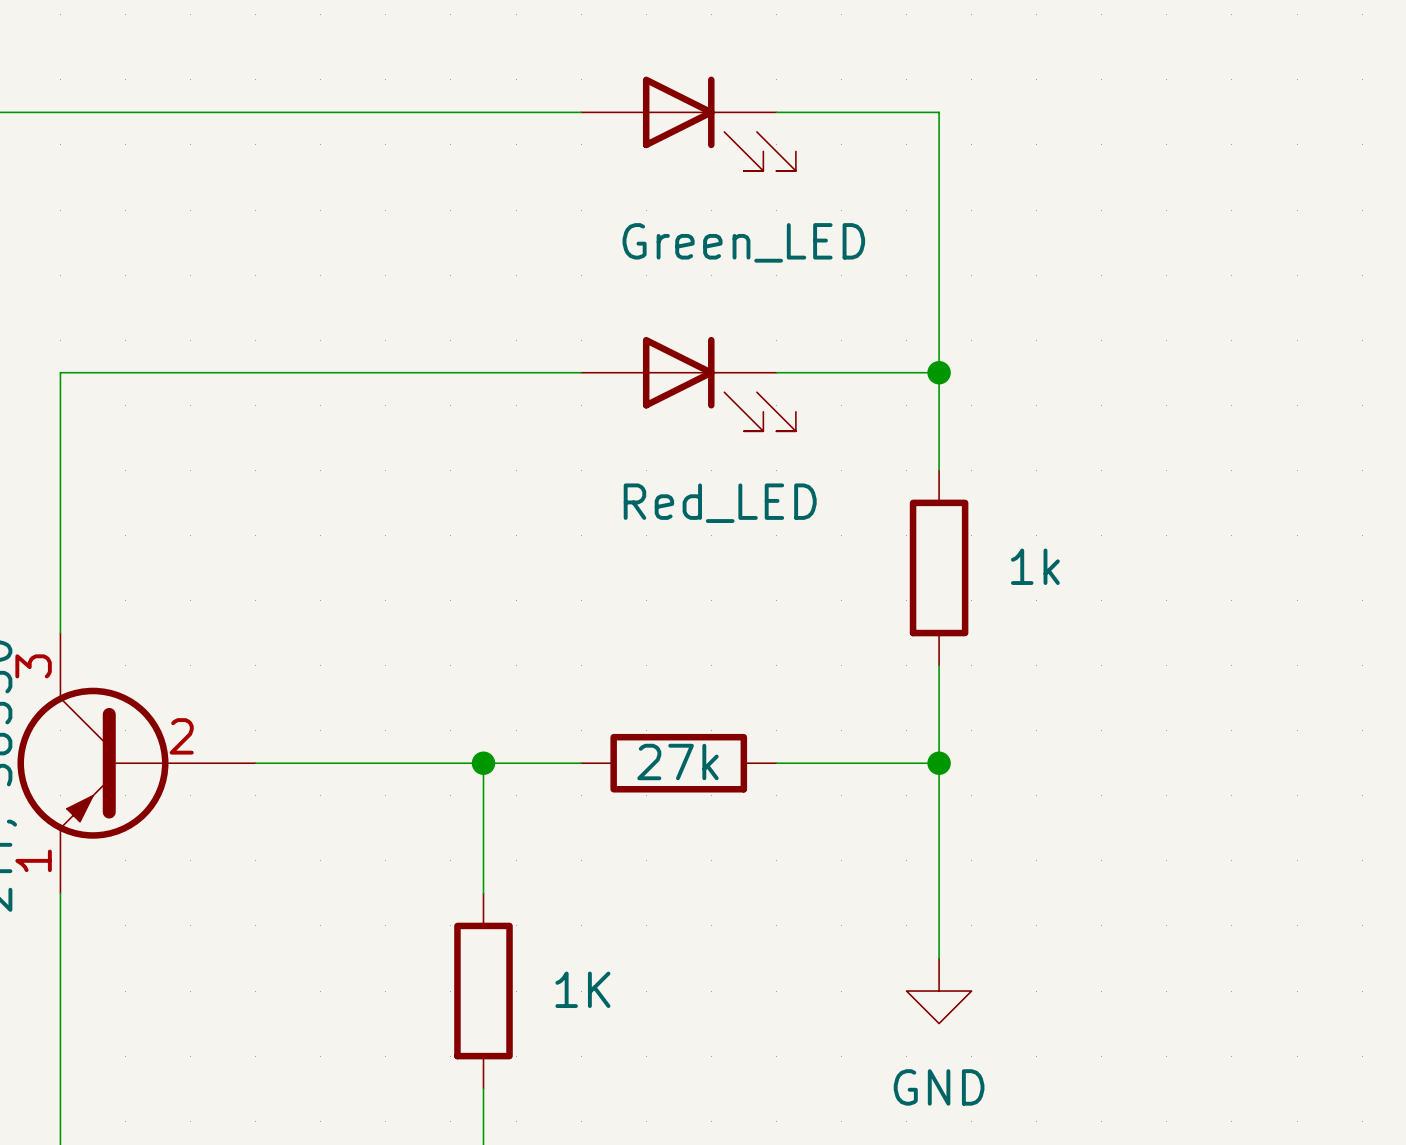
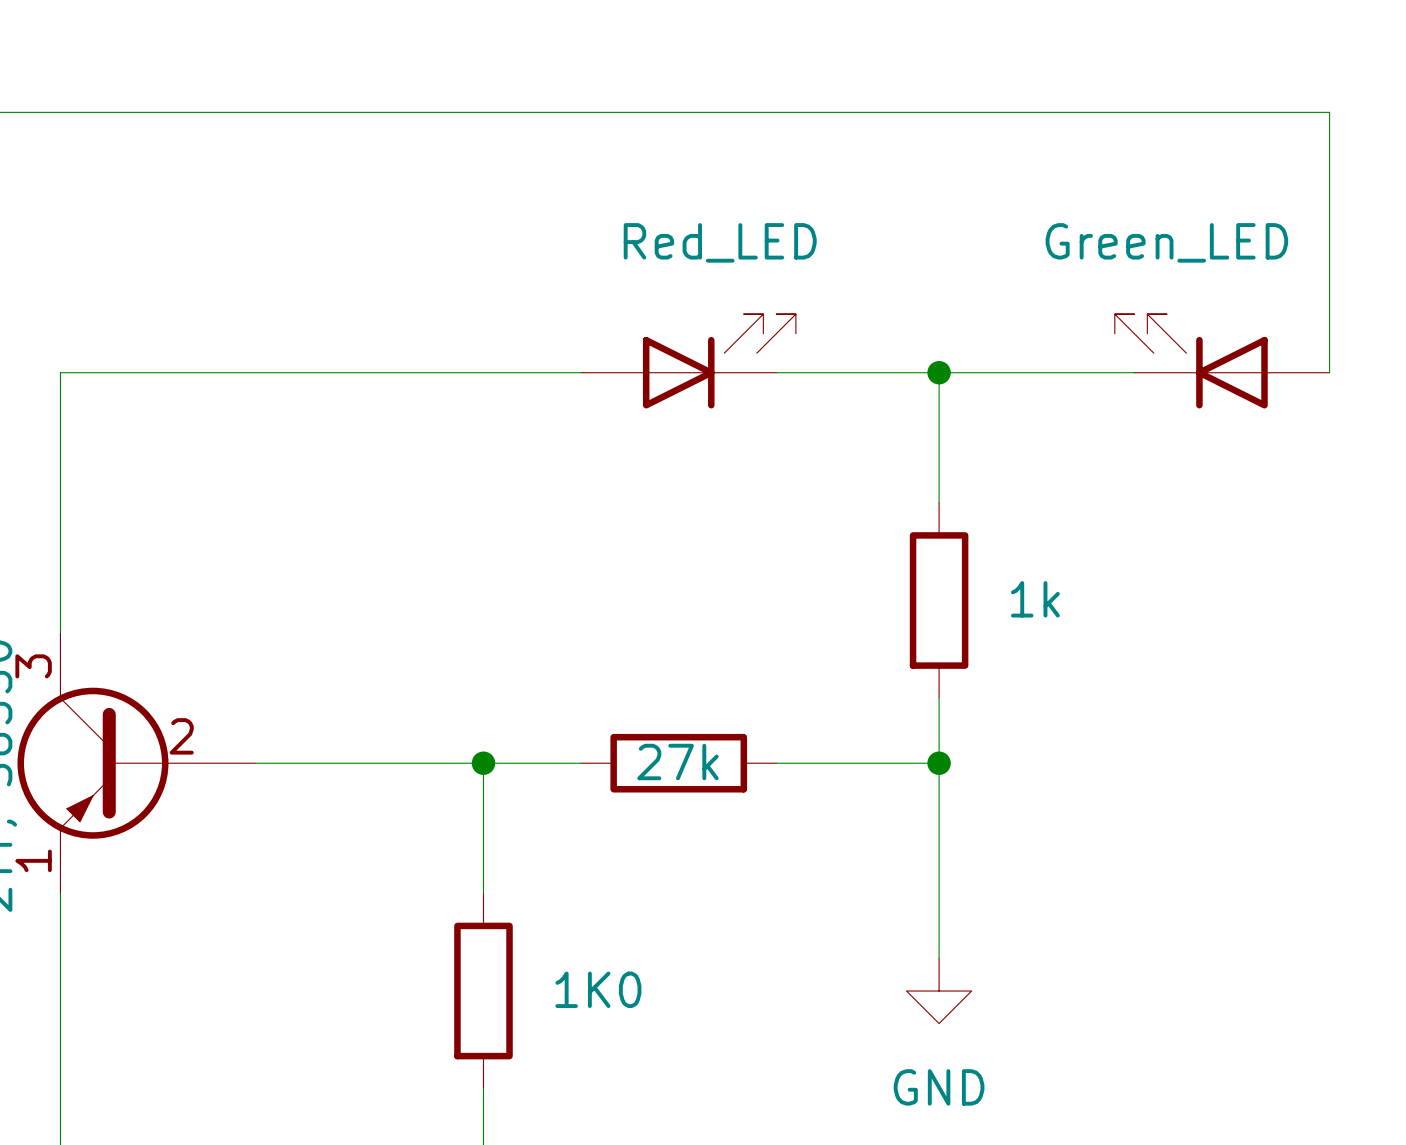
wire: (939, 112) (939, 372) -> (1134, 372) (939, 372)
wire: none -> (939, 112) (1329, 112) (1329, 372)
part position: (688, 123) -> (1222, 361)
part rotation: 0° (719, 123) -> 180° (1191, 361)
part flip: as is (719, 384) -> up-down (719, 361)
part position: (939, 567) -> (939, 600)
part value: 1K (582, 989) -> 1K0 (598, 989)

